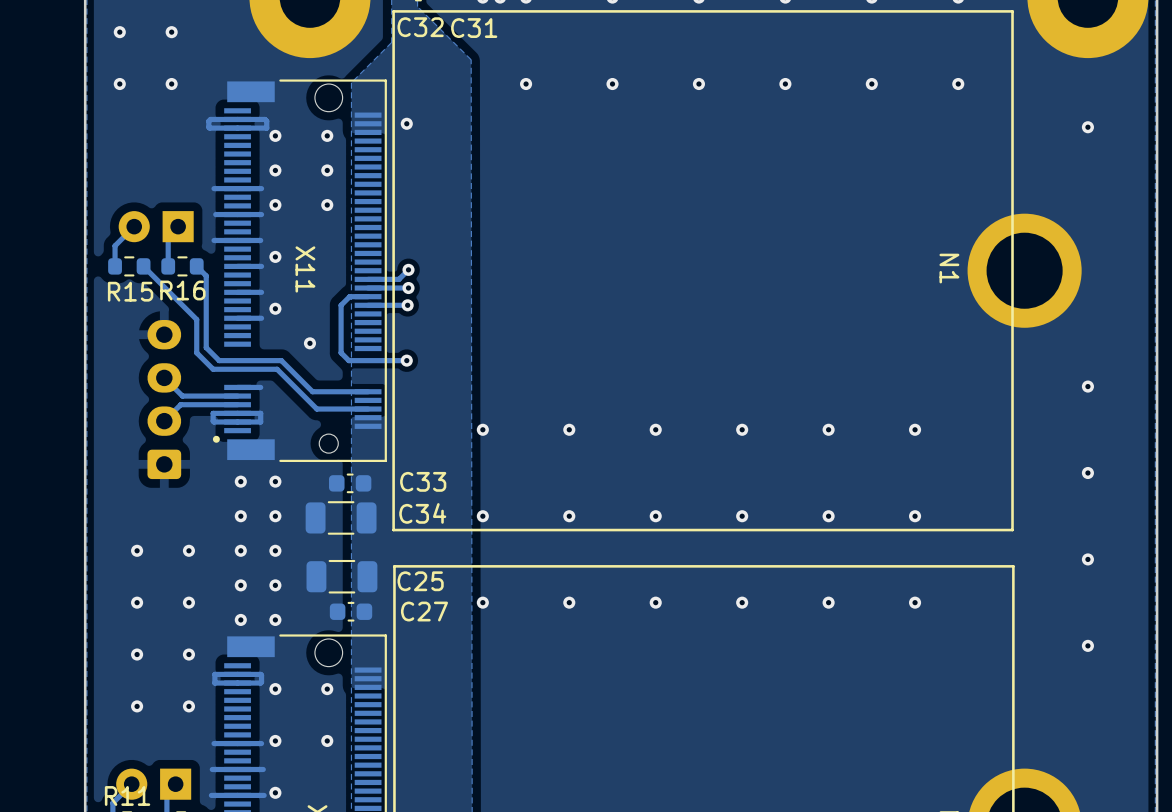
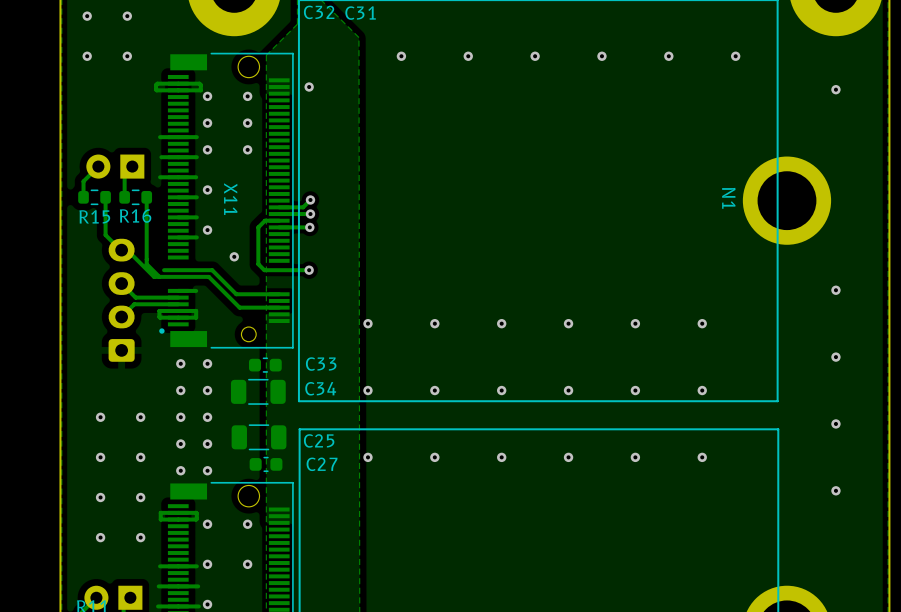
track: (143, 266) (196, 319) -> (105, 197) (105, 235) (120, 250) (127, 250) (154, 276) (159, 276)
track: (196, 266) (206, 275) (206, 347) (219, 360) -> (146, 197) (146, 238)

